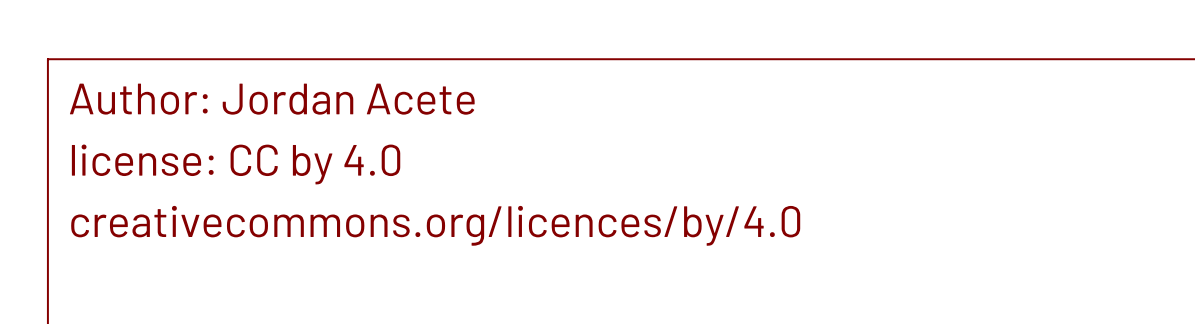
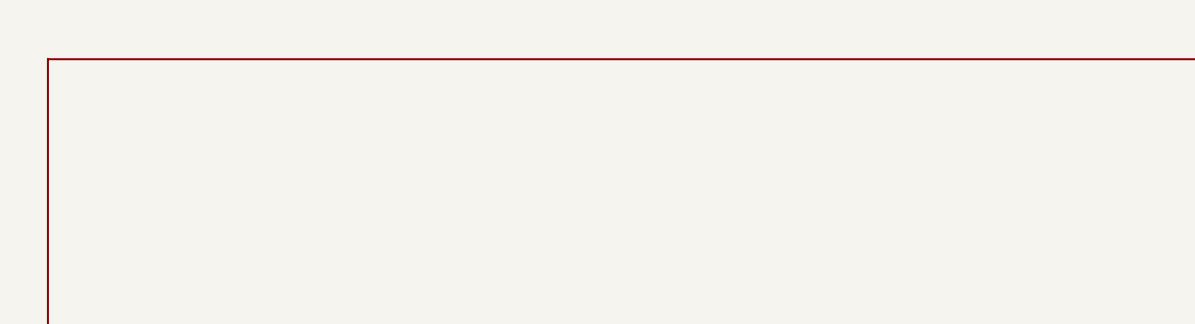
title block: Author: Jordan Acete (272, 99) -> none
title block: license: CC by 4.0 (236, 164) -> none
title block: creativecommons.org/licences/by/4.0 (435, 225) -> none

